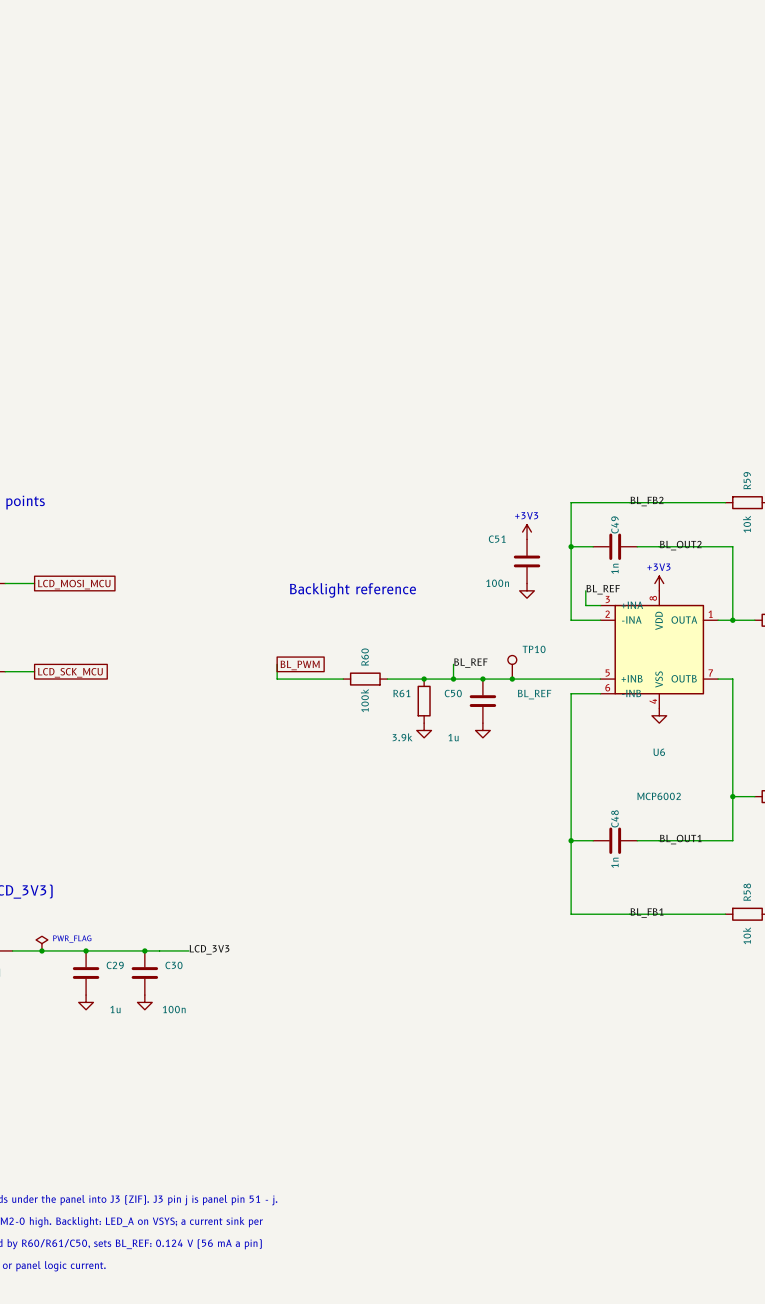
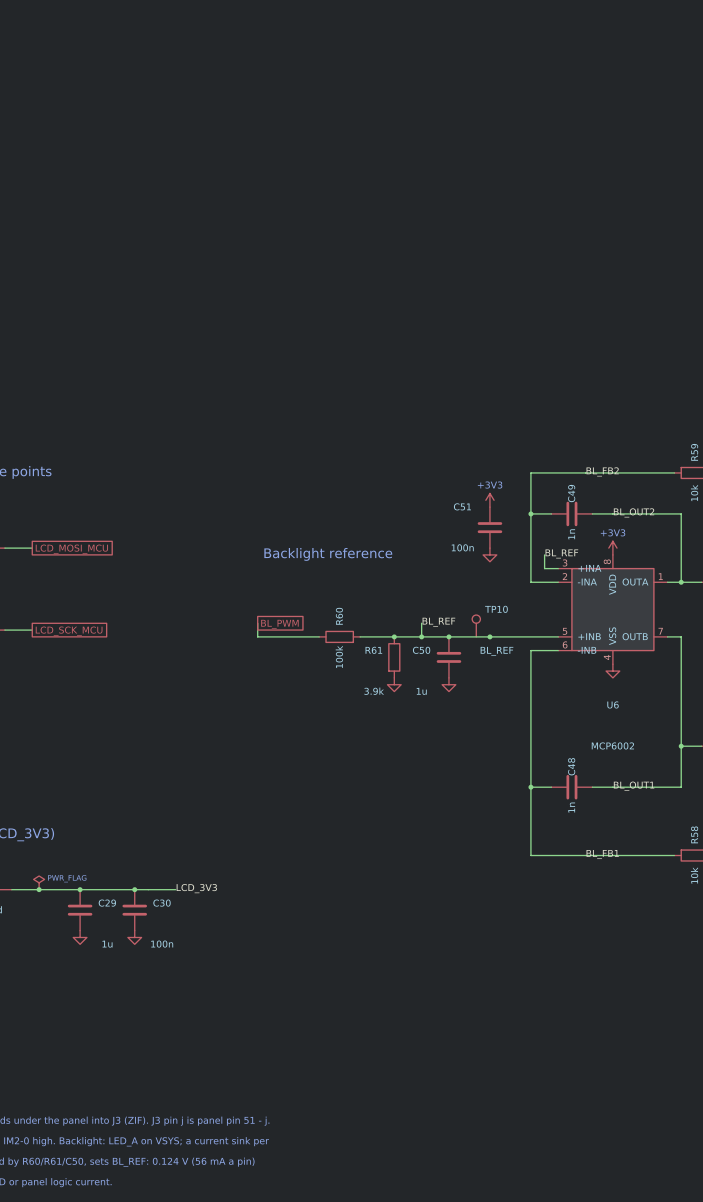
junction position: (512, 679) -> (489, 636)

